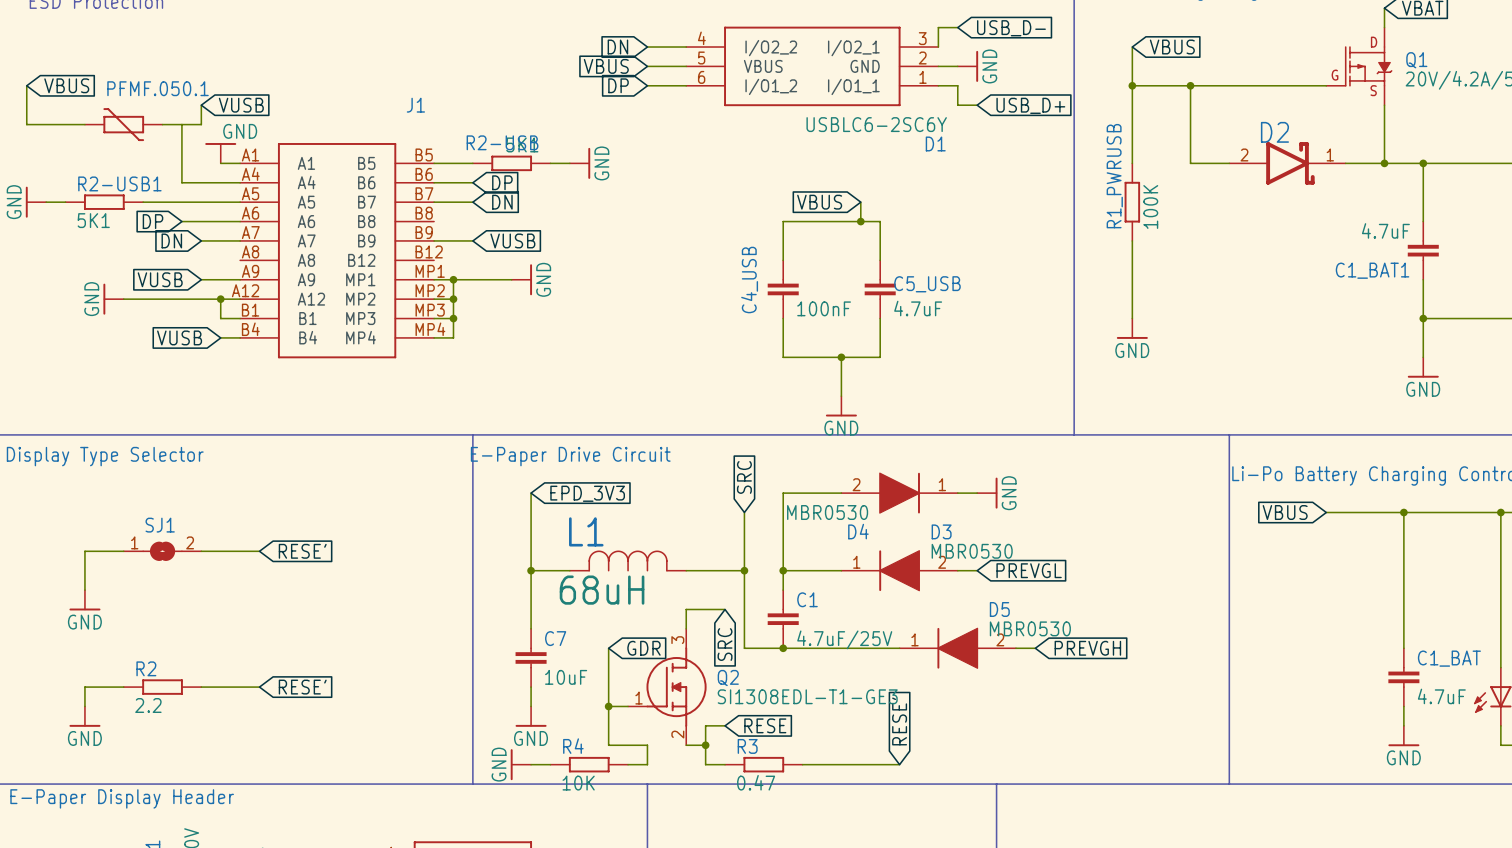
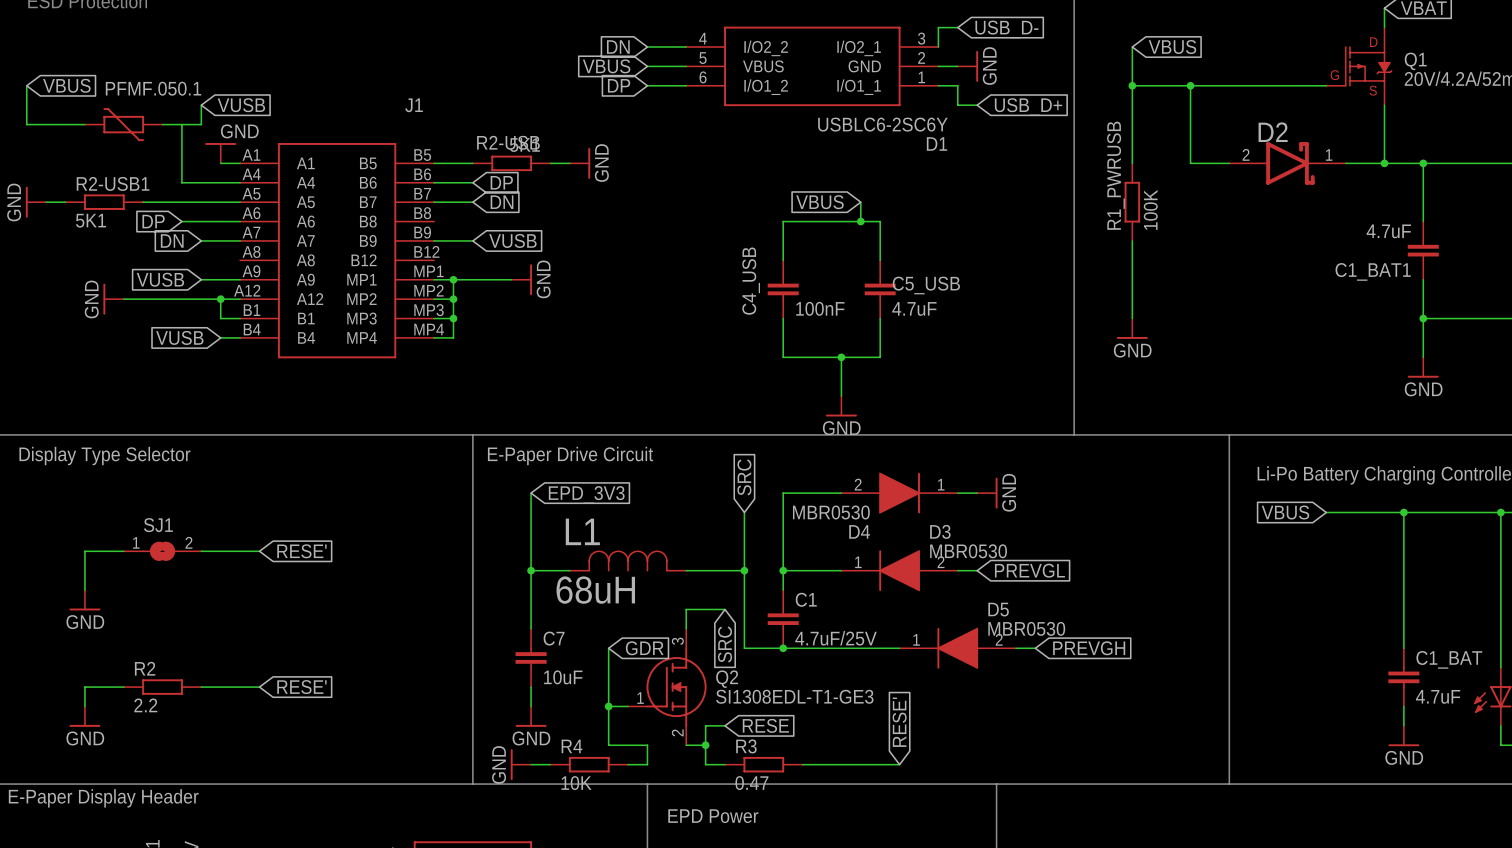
text: none -> EPD Power (713, 816)

